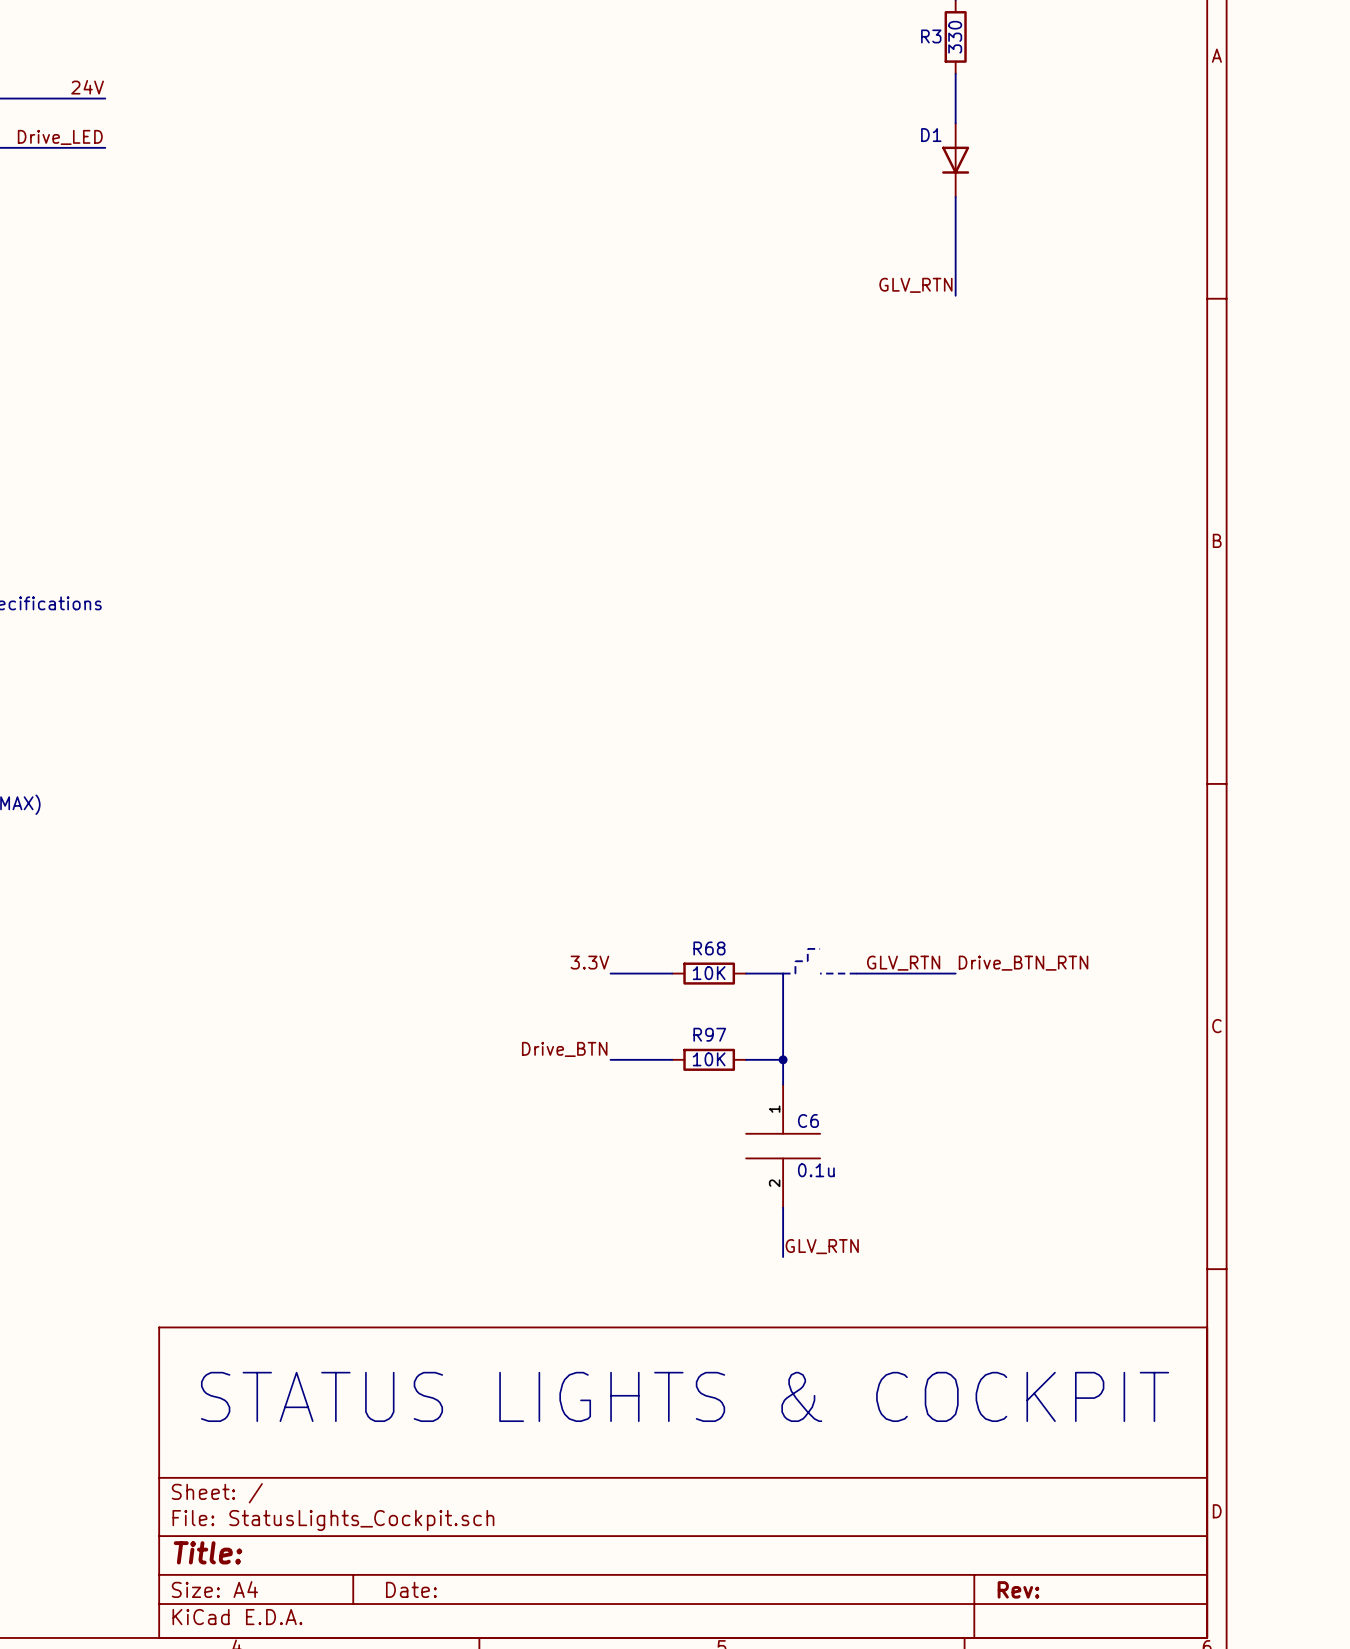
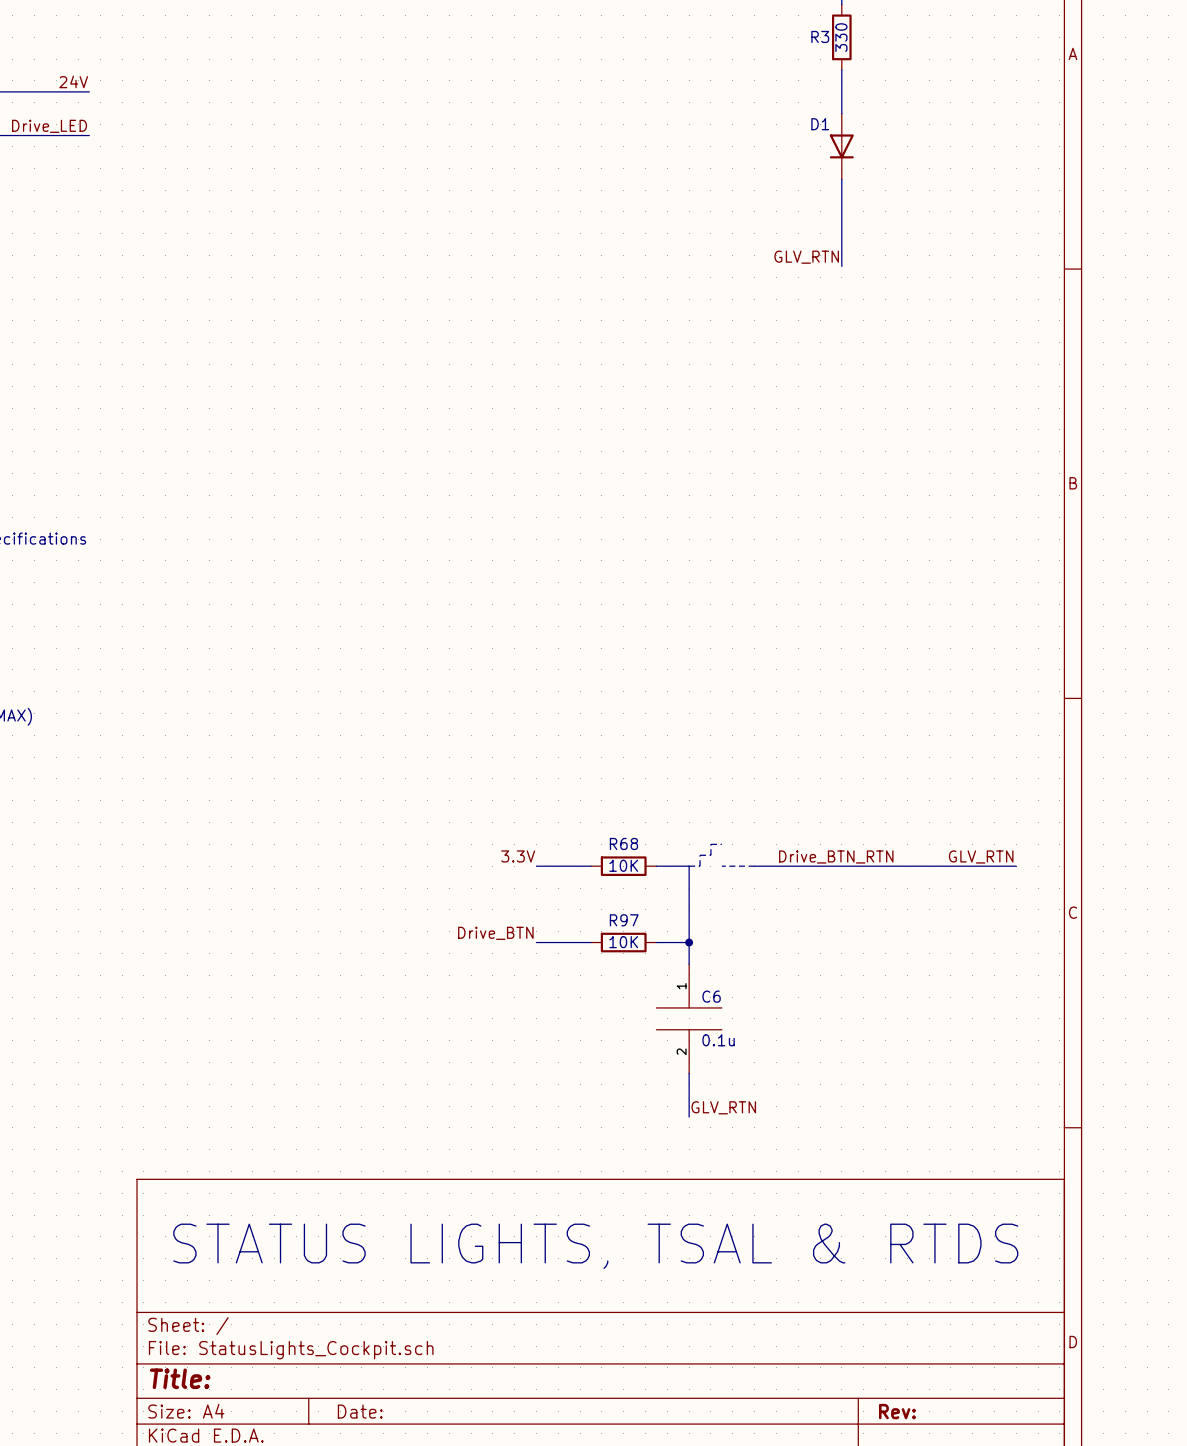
label position: GLV_RTN (903, 963) -> GLV_RTN (981, 856)
label position: Drive_BTN_RTN (1023, 963) -> Drive_BTN_RTN (836, 856)
wire: none -> (841, 866) (1016, 866)
text: STATUS LIGHTS & COCKPIT (685, 1396) -> STATUS LIGHTS, TSAL & RTDS (595, 1246)

